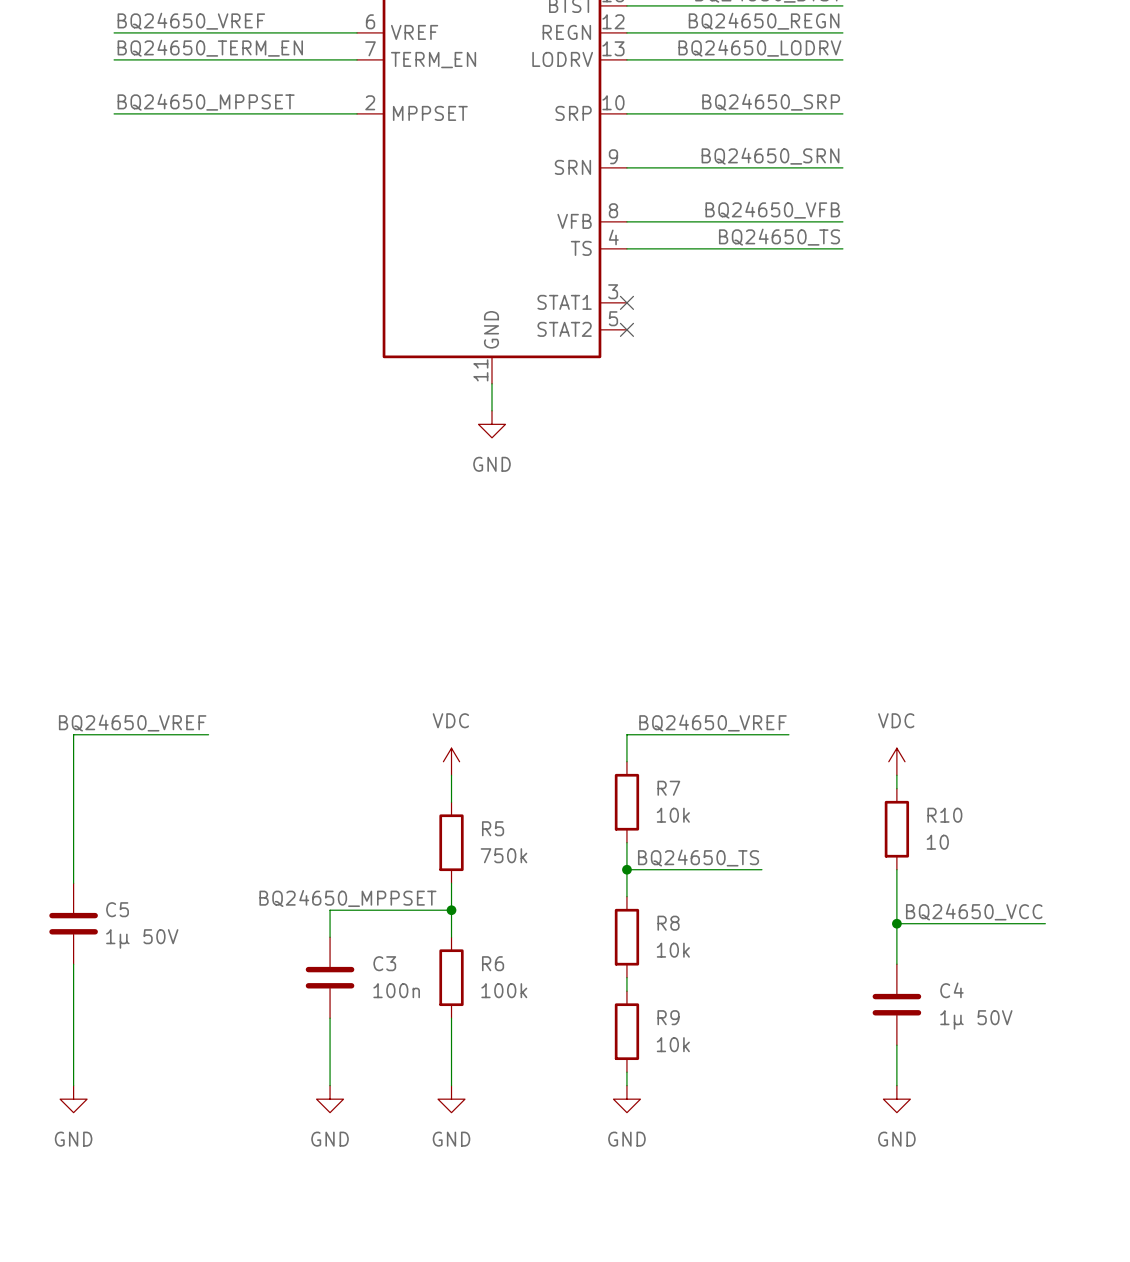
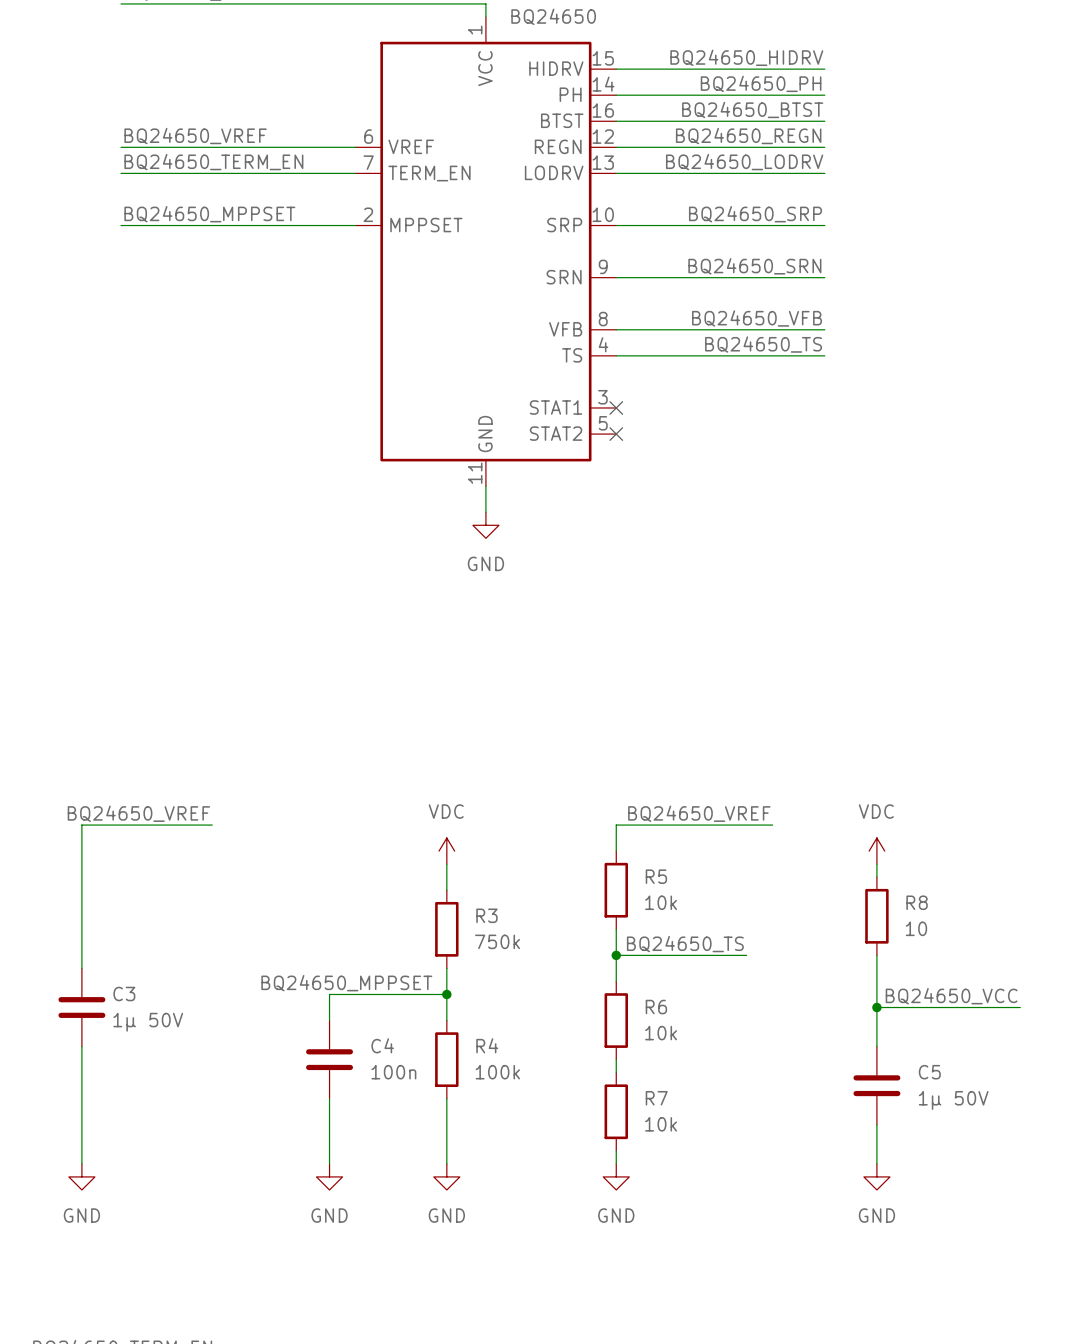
R7 name: R7 (668, 788) -> R5 (656, 876)
R10 name: R10 (944, 815) -> R8 (917, 902)
R5 name: R5 (493, 828) -> R3 (486, 915)
C5 name: C5 (117, 909) -> C3 (124, 993)
R8 name: R8 (668, 923) -> R6 (656, 1007)
C3 name: C3 (384, 963) -> C4 (382, 1045)
R6 name: R6 (493, 963) -> R4 (487, 1045)
C4 name: C4 (951, 990) -> C5 (929, 1072)
R9 name: R9 (668, 1017) -> R7 (656, 1098)

